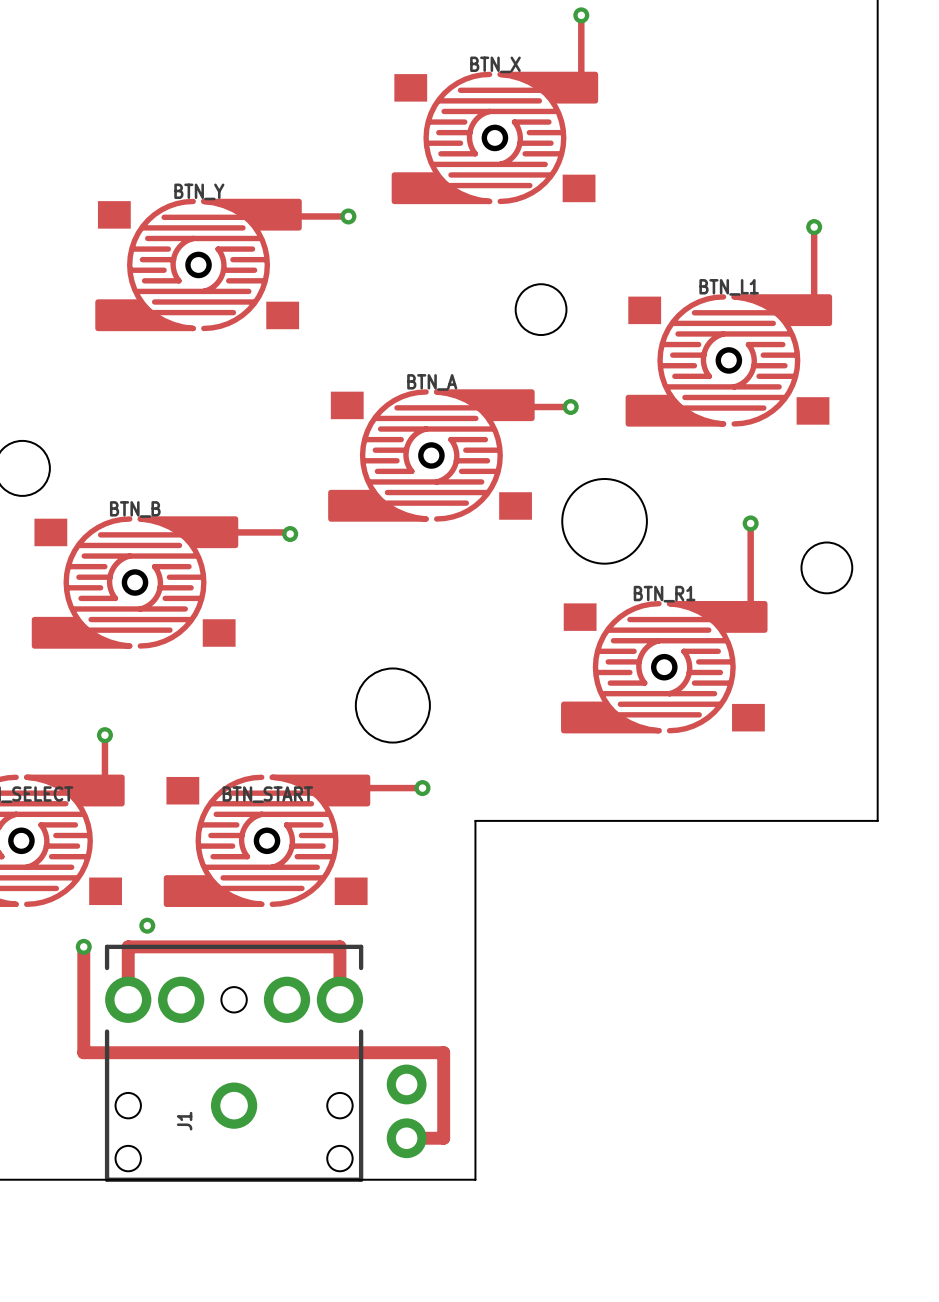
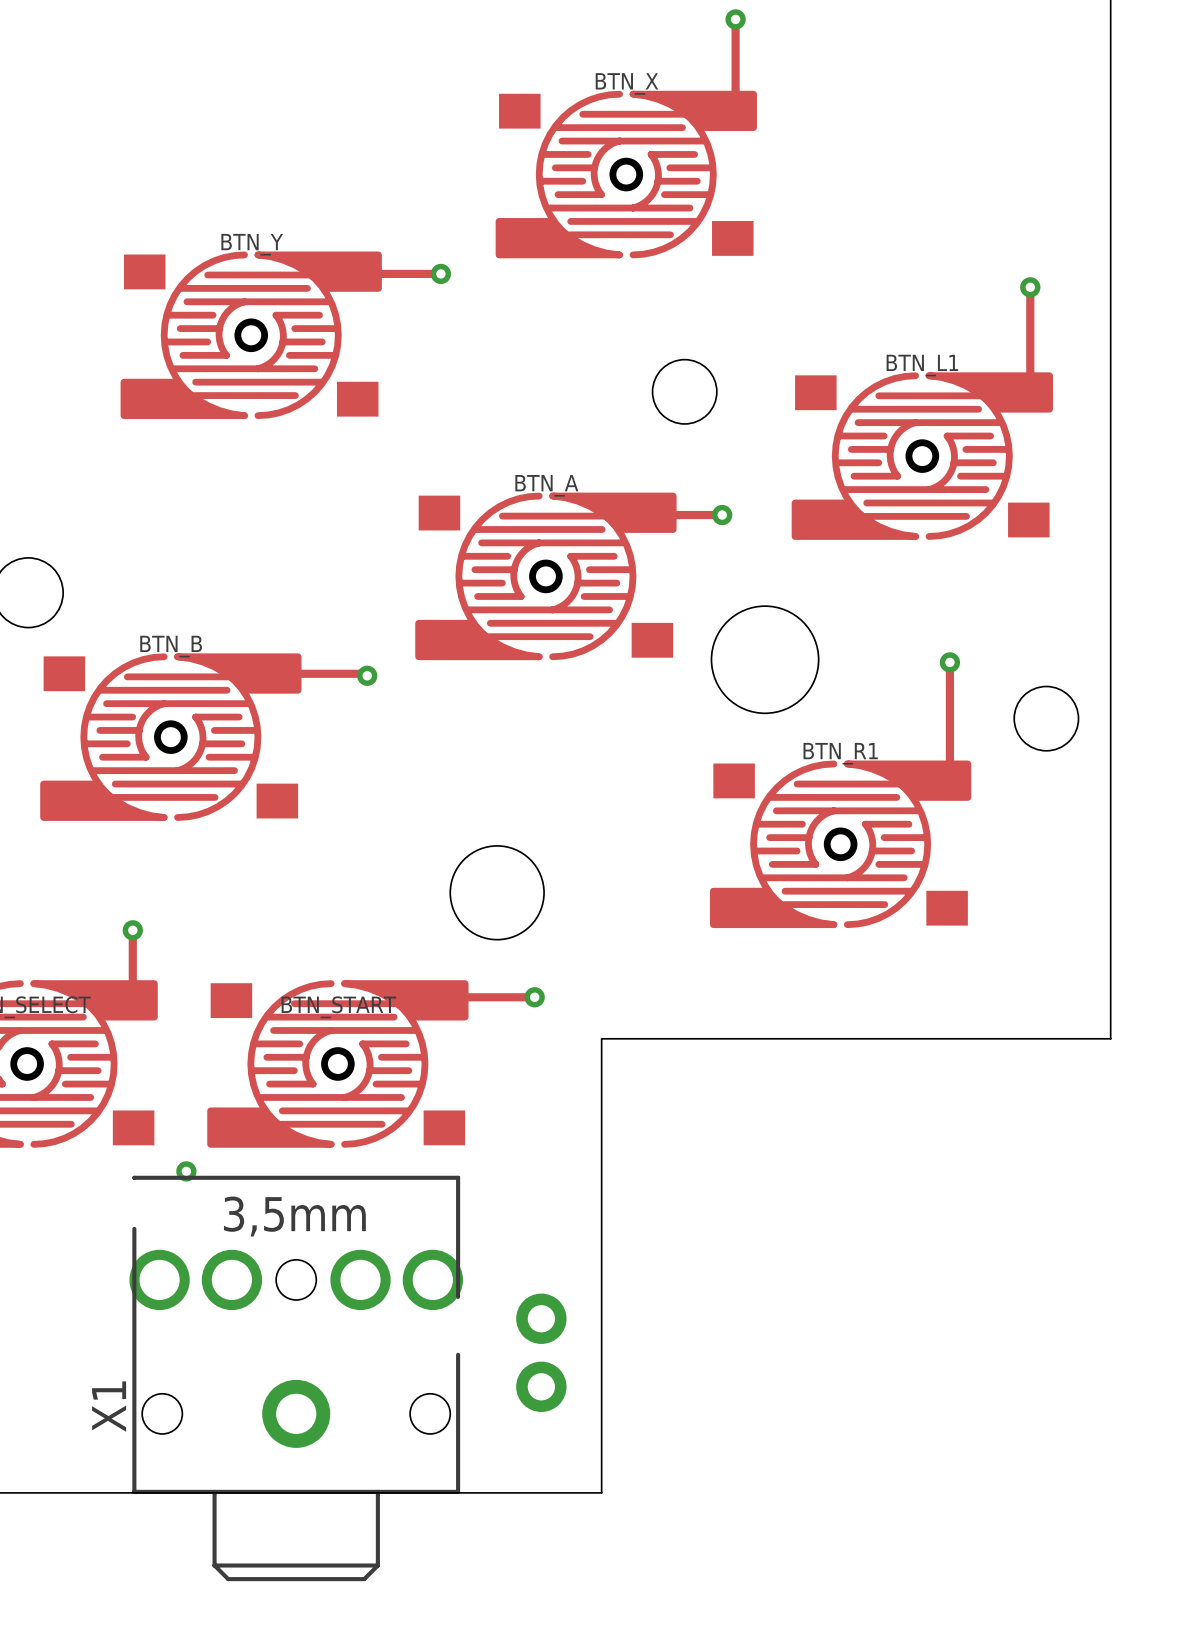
track: (83, 946) (83, 1052) (443, 1052) (443, 1138) (406, 1138) -> none
via: (83, 946) -> none
track: (128, 999) (128, 946) (339, 946) (339, 999) -> none
J1: (234, 1063) -> none
X1: none -> (296, 1378)
part position: (406, 1111) -> (541, 1352)

